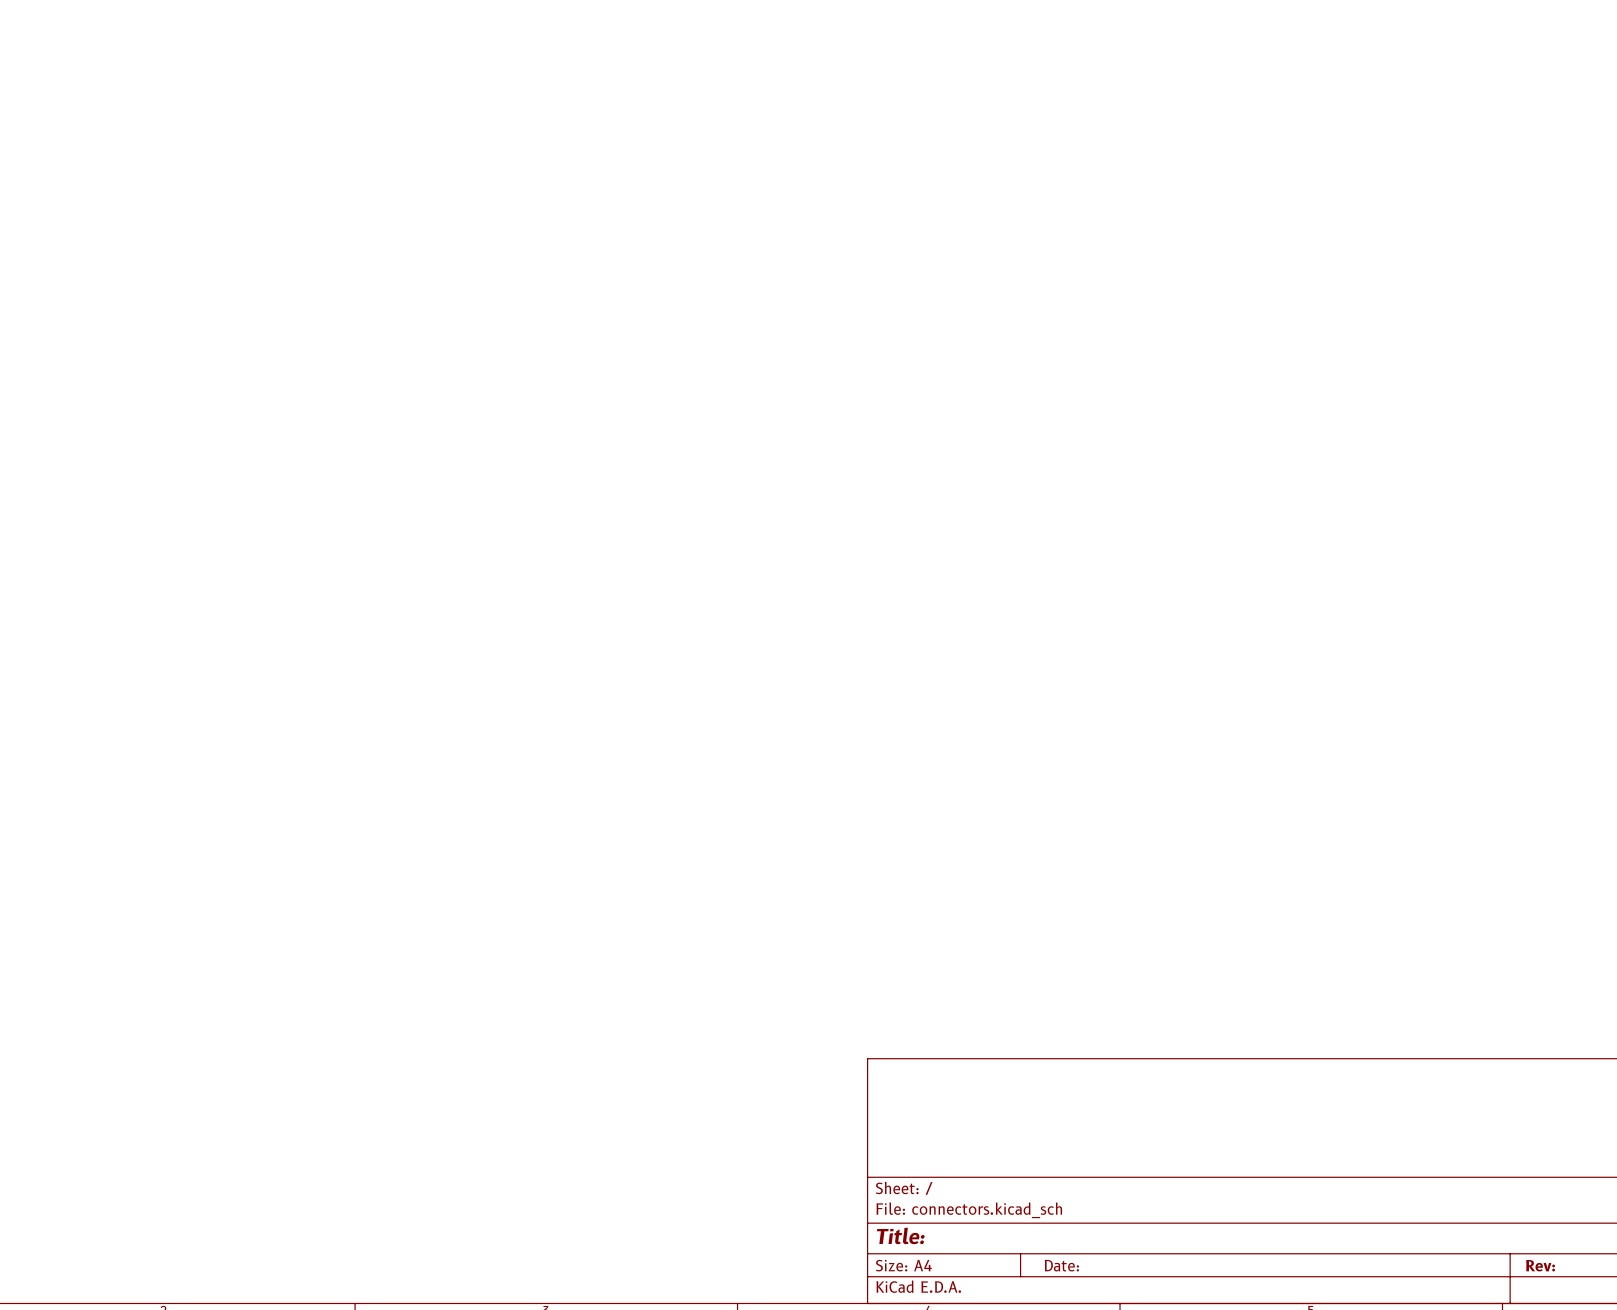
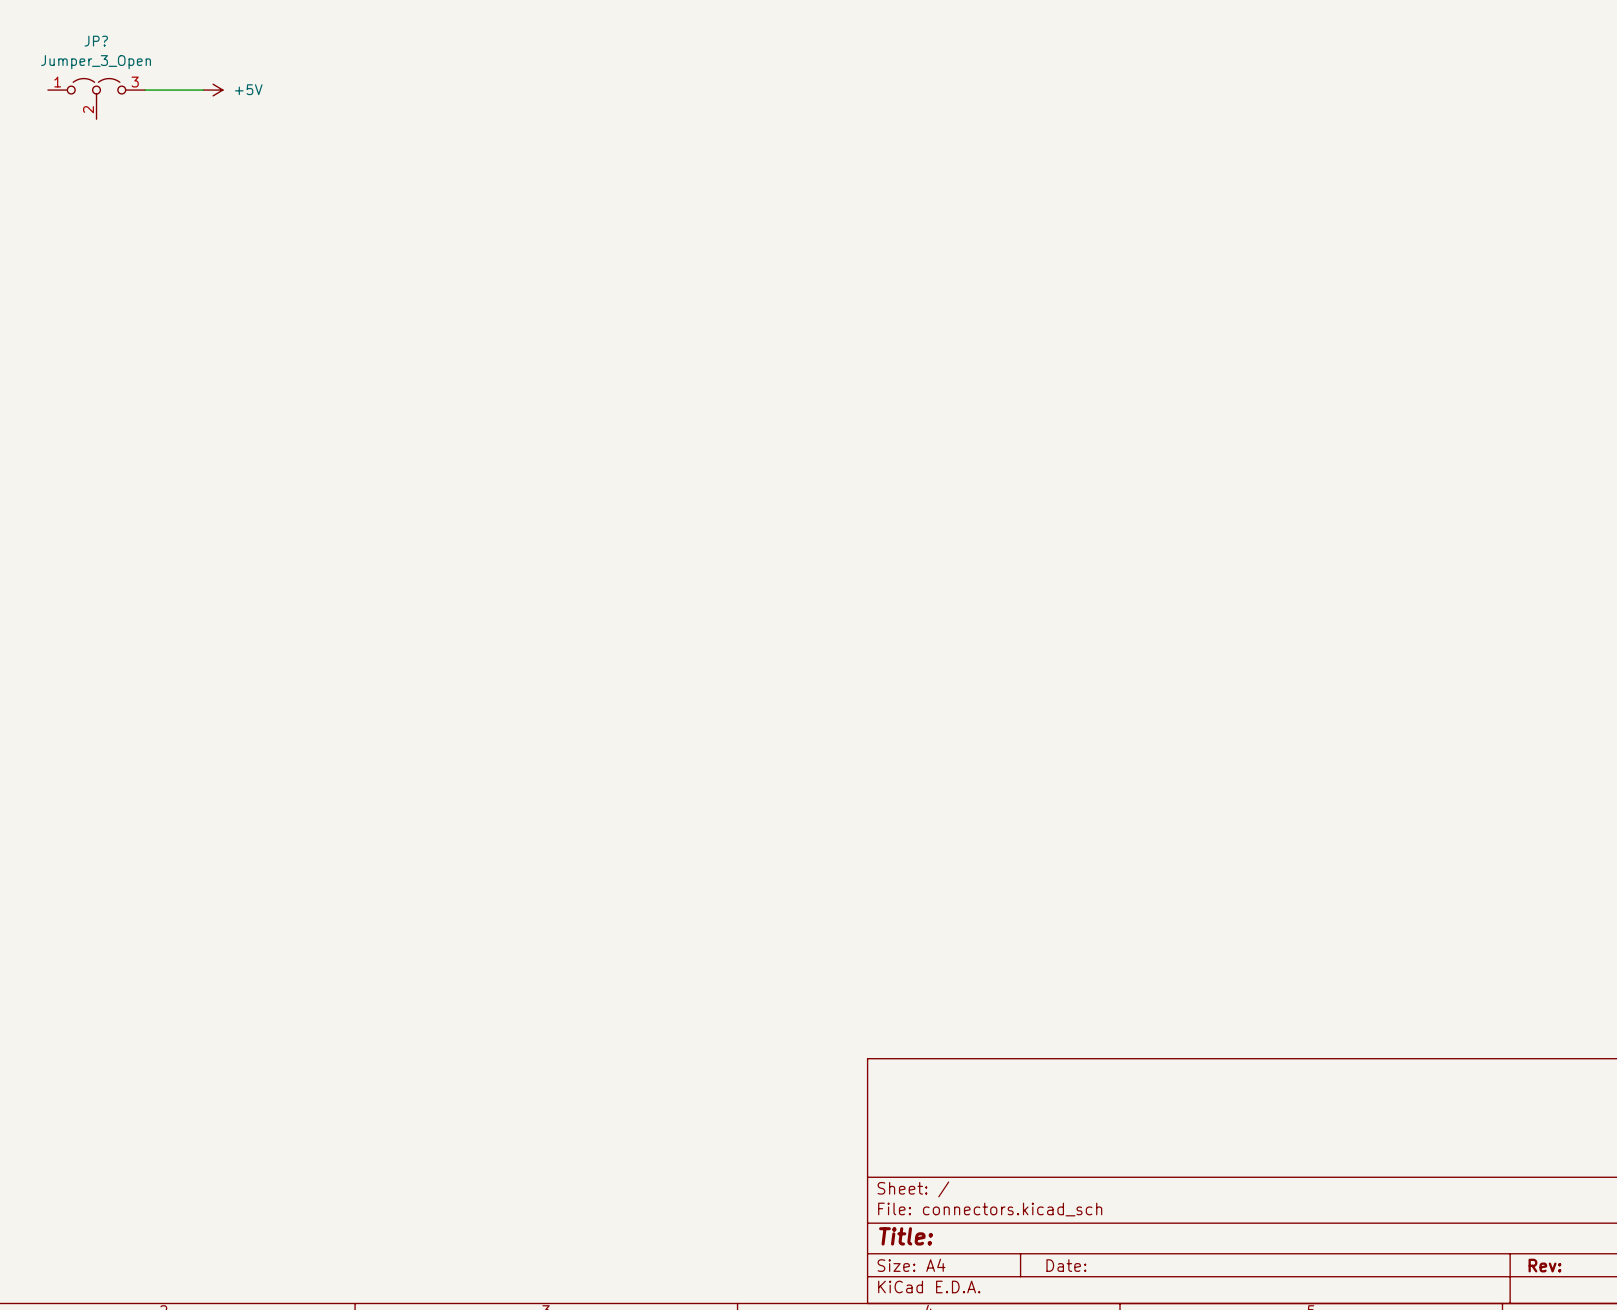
wire: none -> (145, 90) (203, 90)
power symbol: none -> +5V (213, 90)
JP?: none -> Jumper_3_Open (96, 98)

